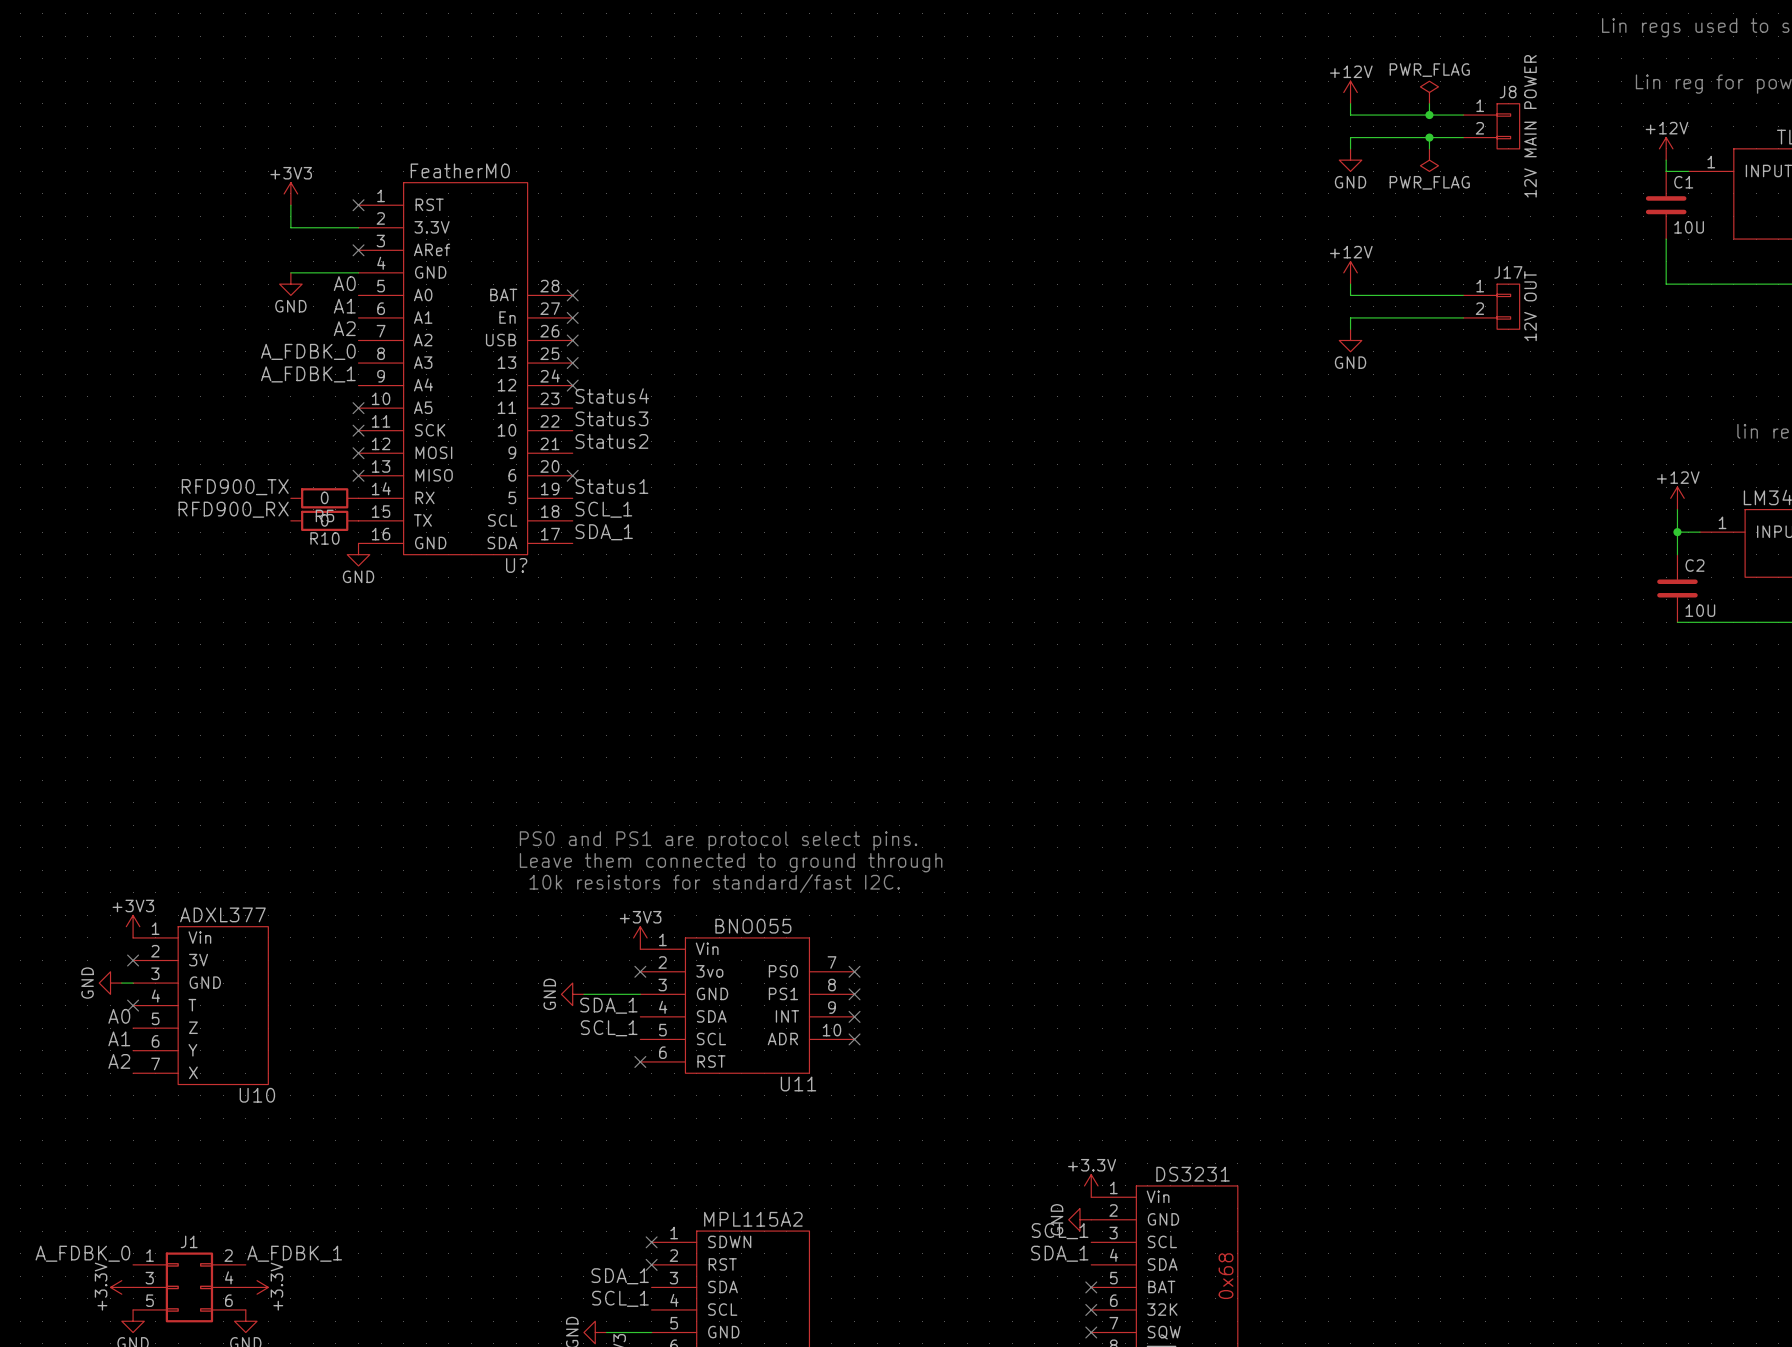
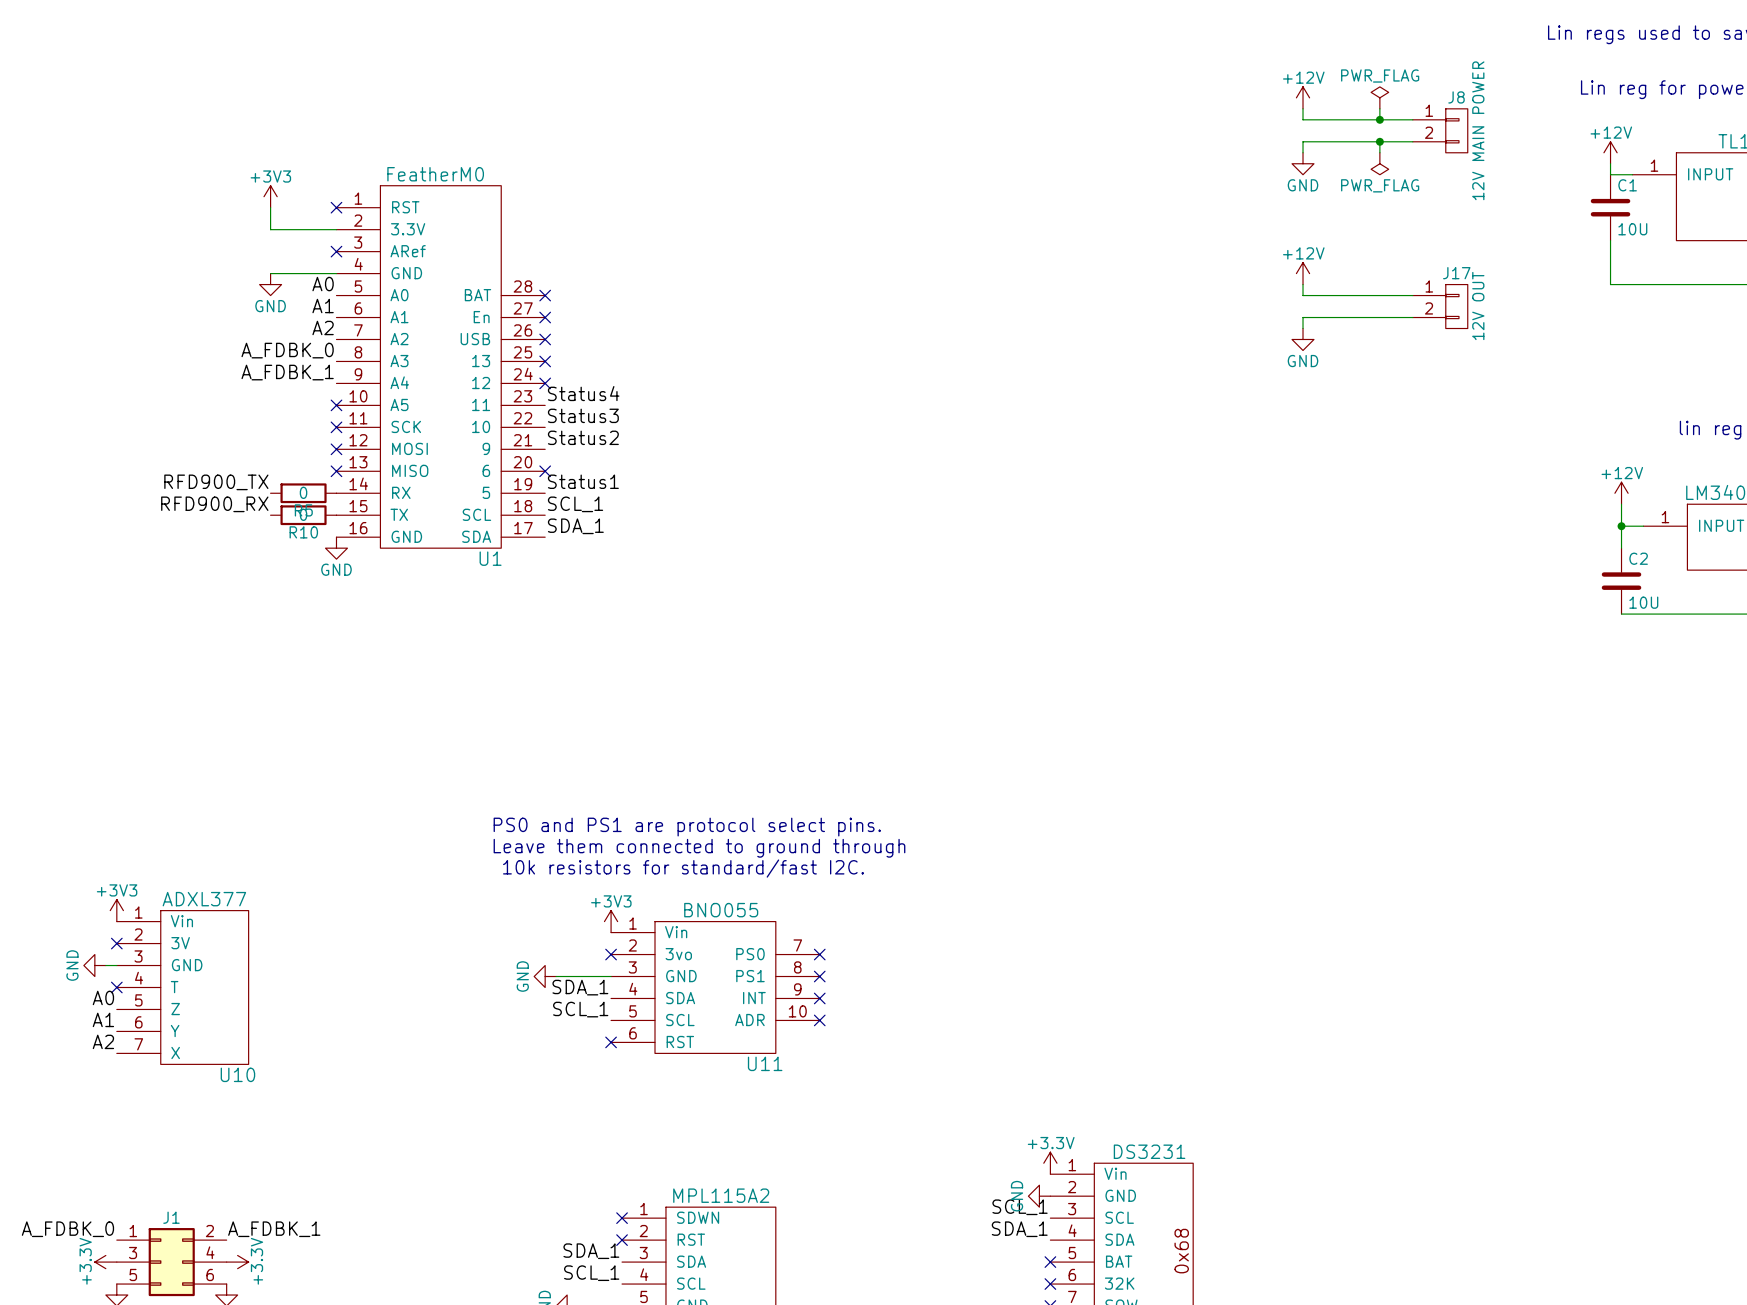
U? name: U? (516, 565) -> U1 (490, 558)

